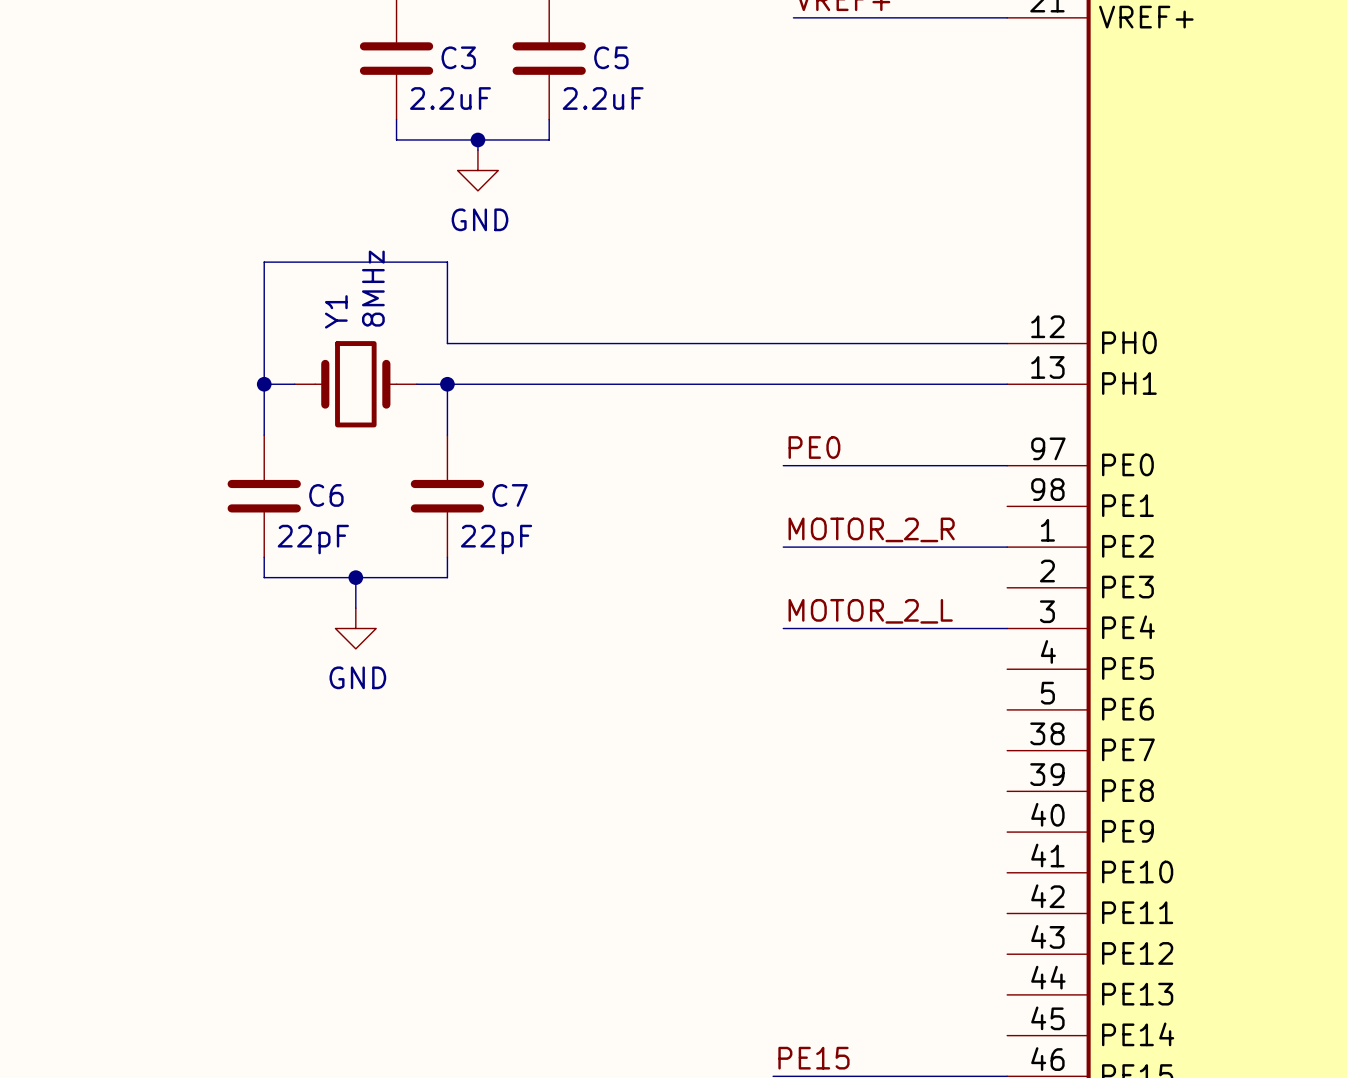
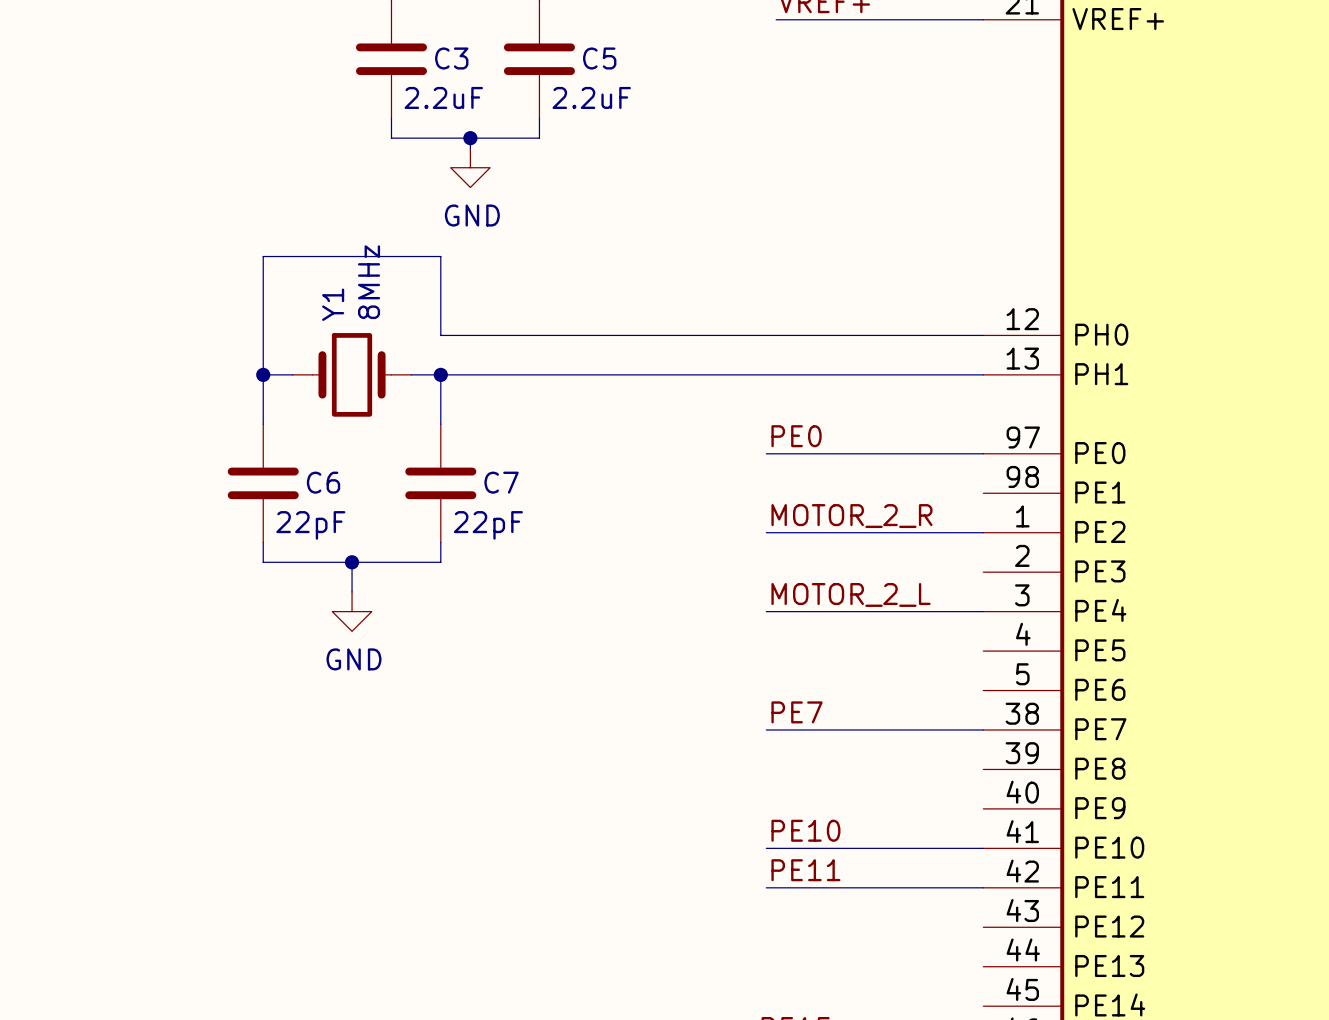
label: none -> PE7 (797, 712)
wire: none -> (766, 729) (983, 729)
label: none -> PE10 (805, 830)
wire: none -> (766, 848) (983, 848)
label: none -> PE11 (805, 870)
wire: none -> (766, 887) (983, 887)

